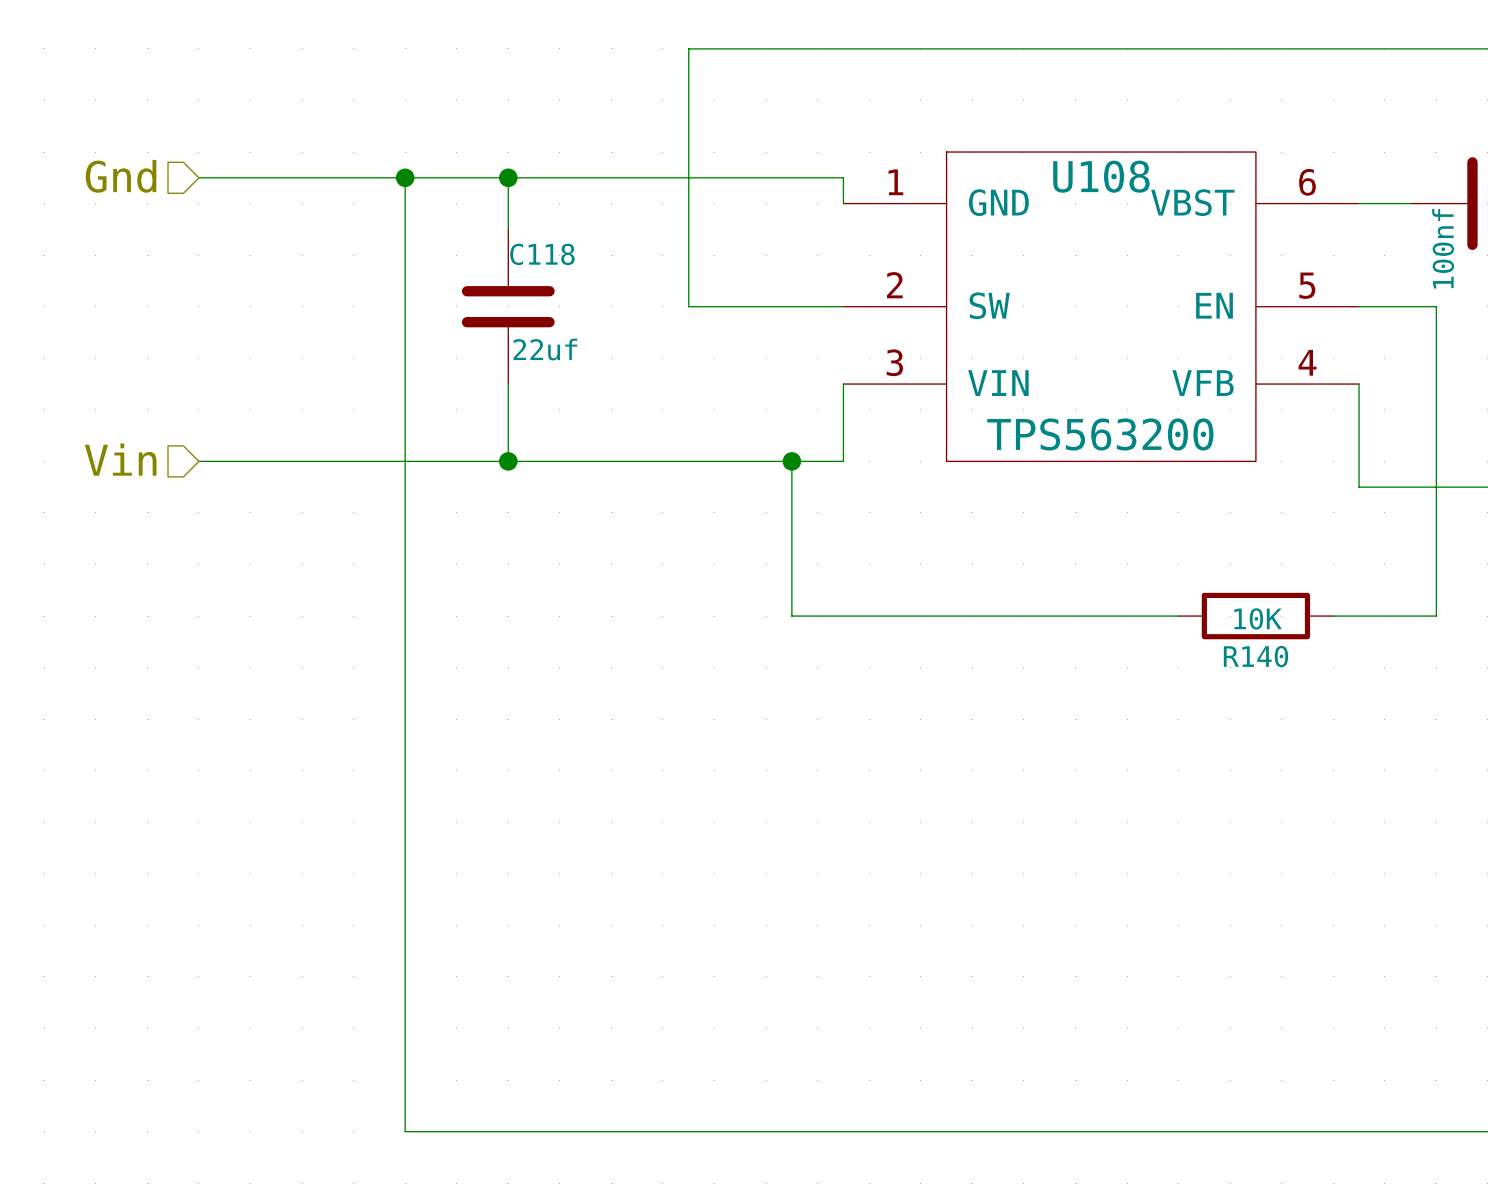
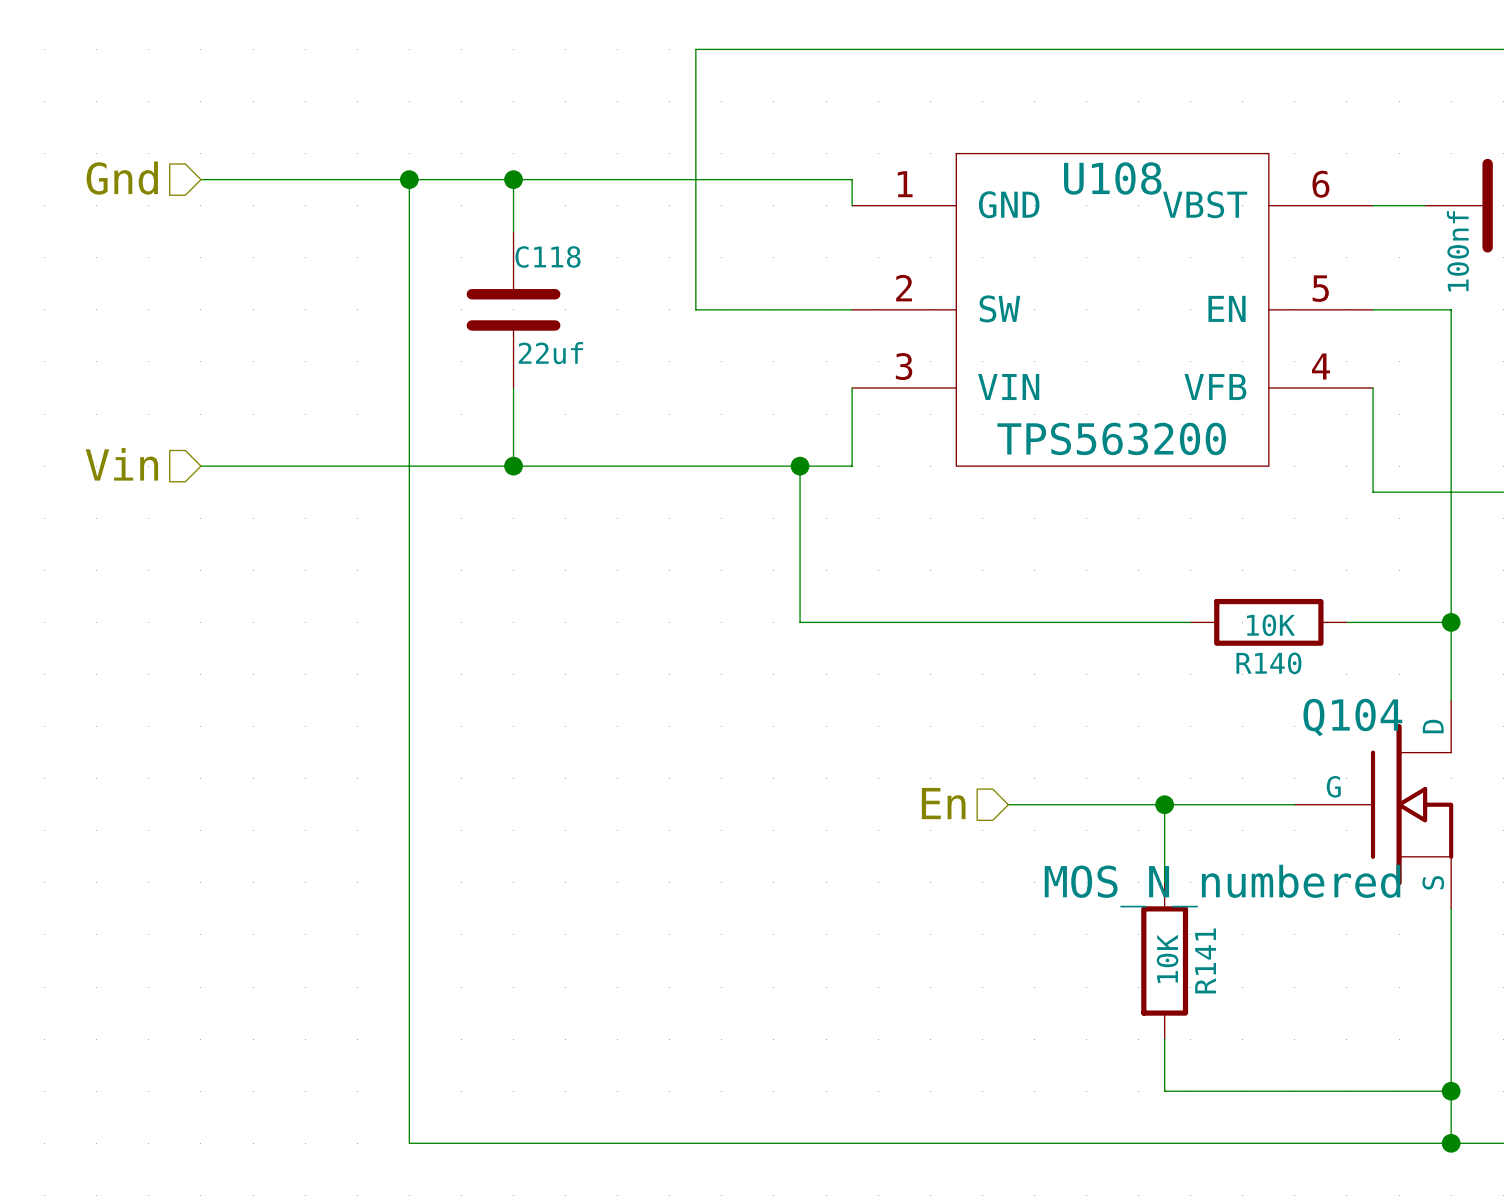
wire: none -> (1451, 622) (1451, 700)
junction: none -> (1451, 622)
hierarchical label: none -> En (943, 803)
wire: none -> (1008, 804) (1294, 804)
wire: none -> (1164, 804) (1164, 882)
junction: none -> (1164, 804)
Q104: none -> MOS_N_numbered (1374, 804)
wire: none -> (1451, 908) (1451, 1143)
R141: none -> 10K (1164, 960)
wire: none -> (1164, 1039) (1164, 1091) (1451, 1091)
junction: none -> (1451, 1091)
junction: none -> (1451, 1143)

